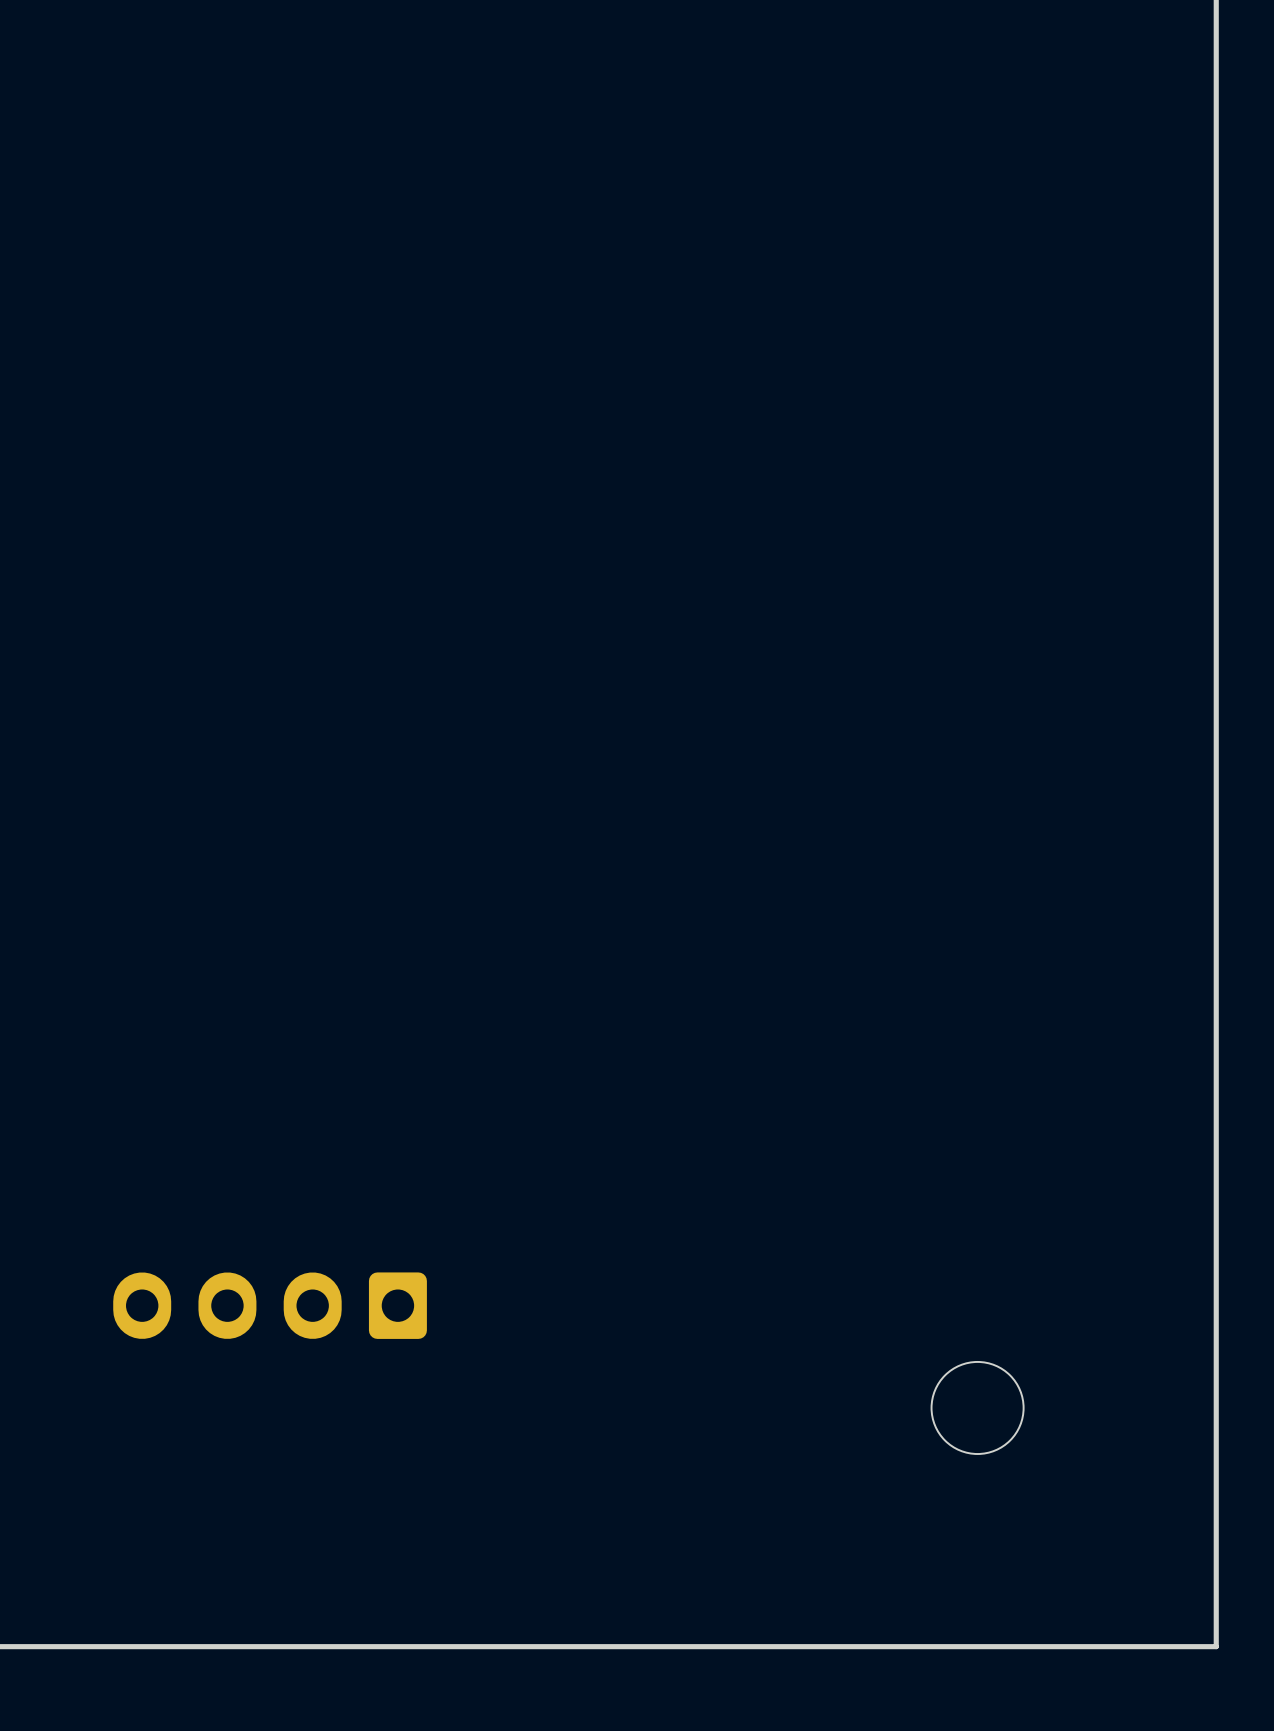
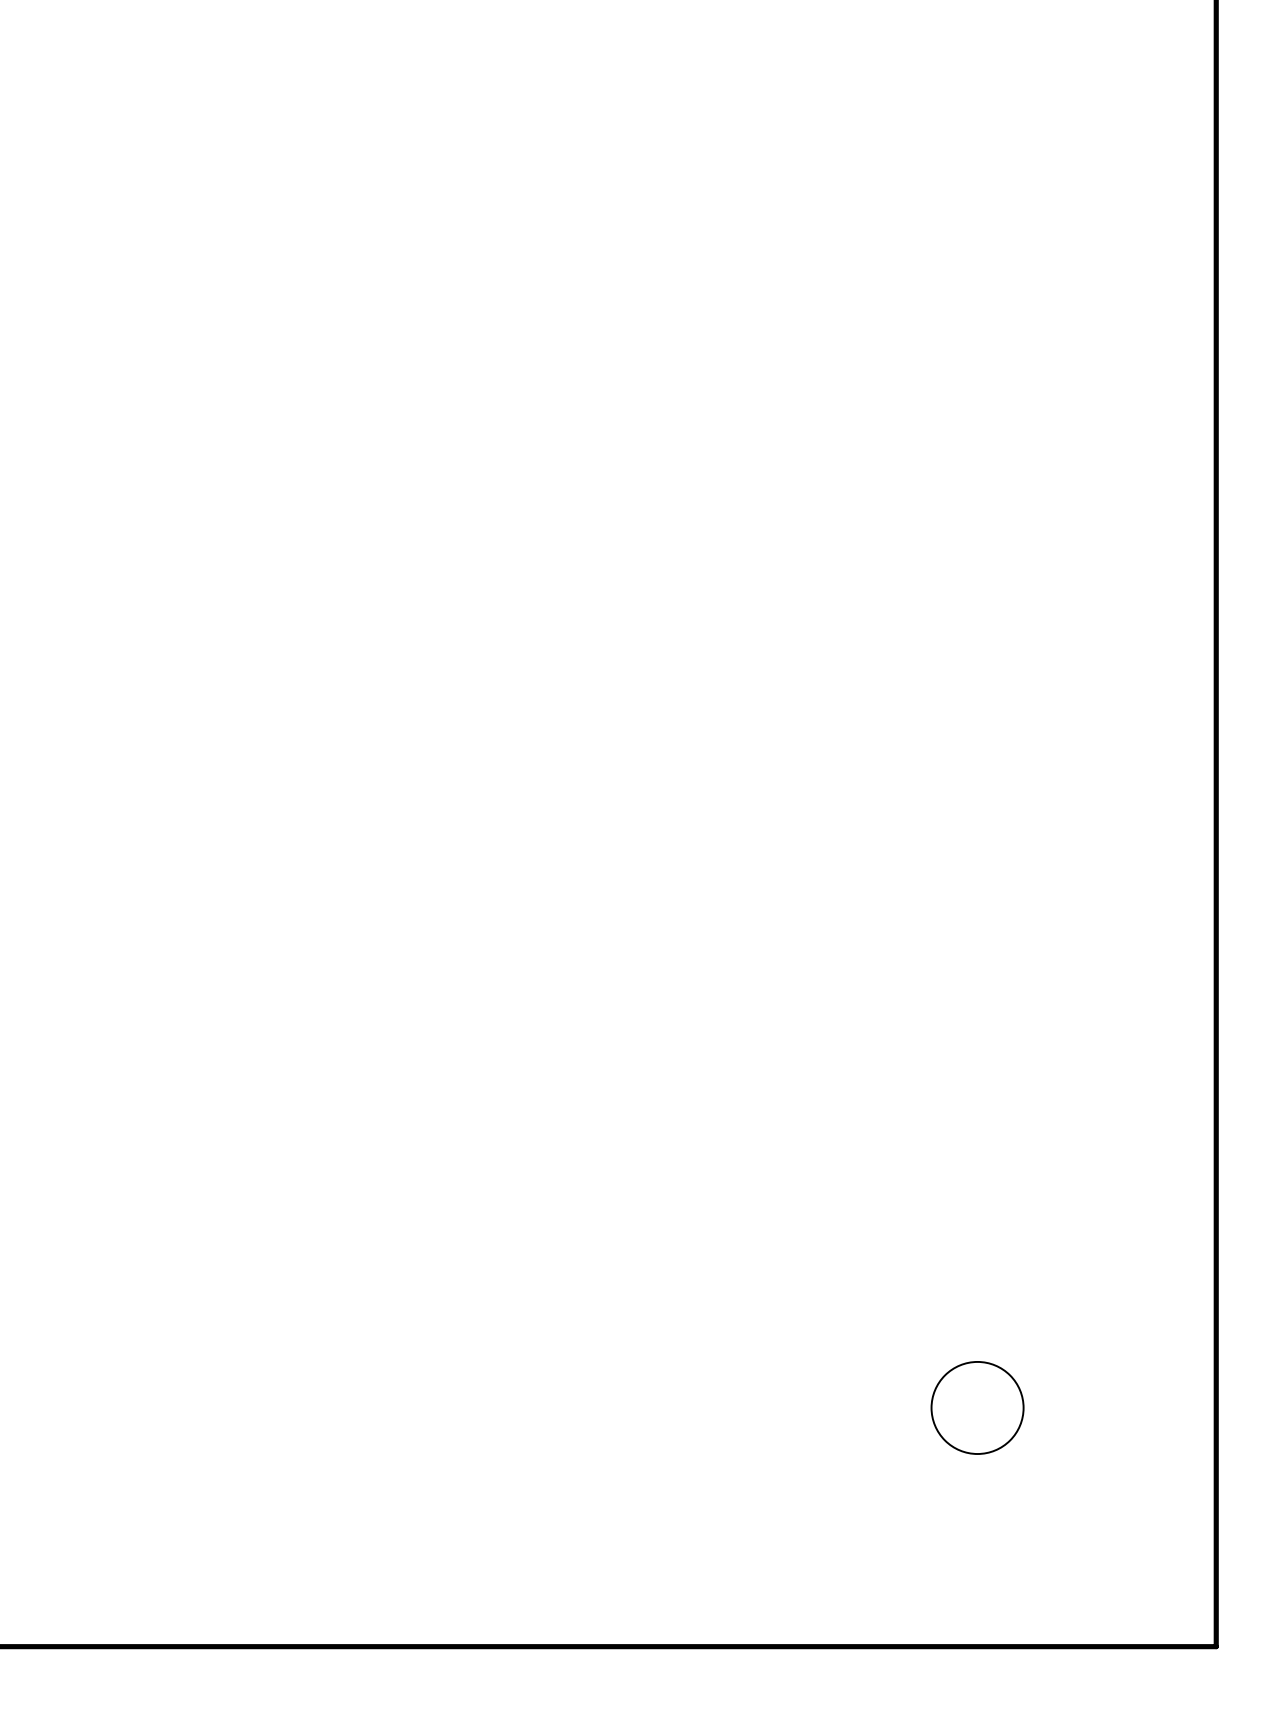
part: (270, 1305) -> none

